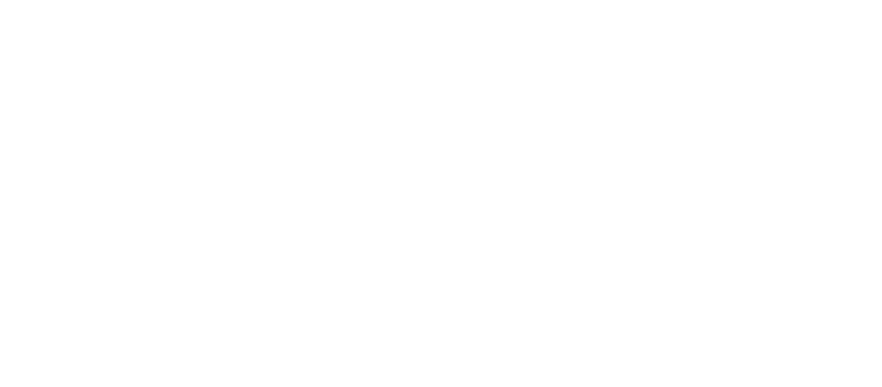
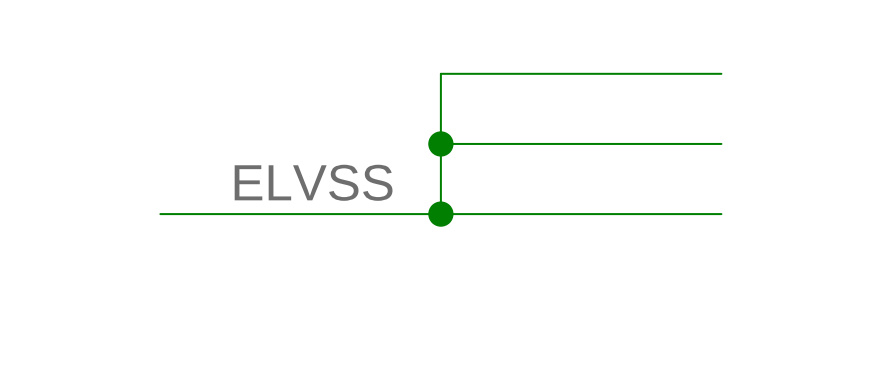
wire: none -> (721, 73) (440, 73) (440, 214)
wire: none -> (440, 143) (721, 143)
junction: none -> (440, 143)
label: none -> ELVSS (313, 182)
wire: none -> (160, 214) (721, 214)
junction: none -> (440, 214)

